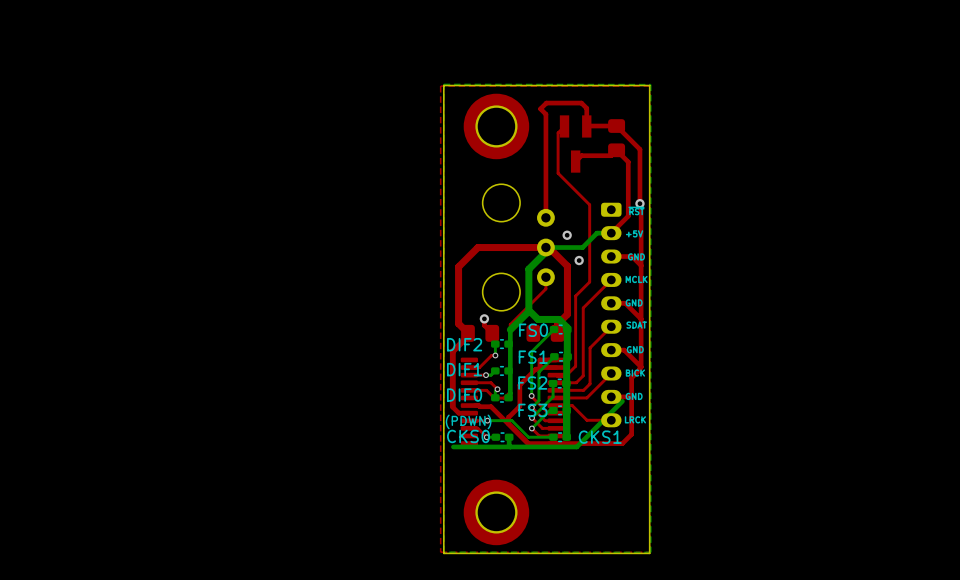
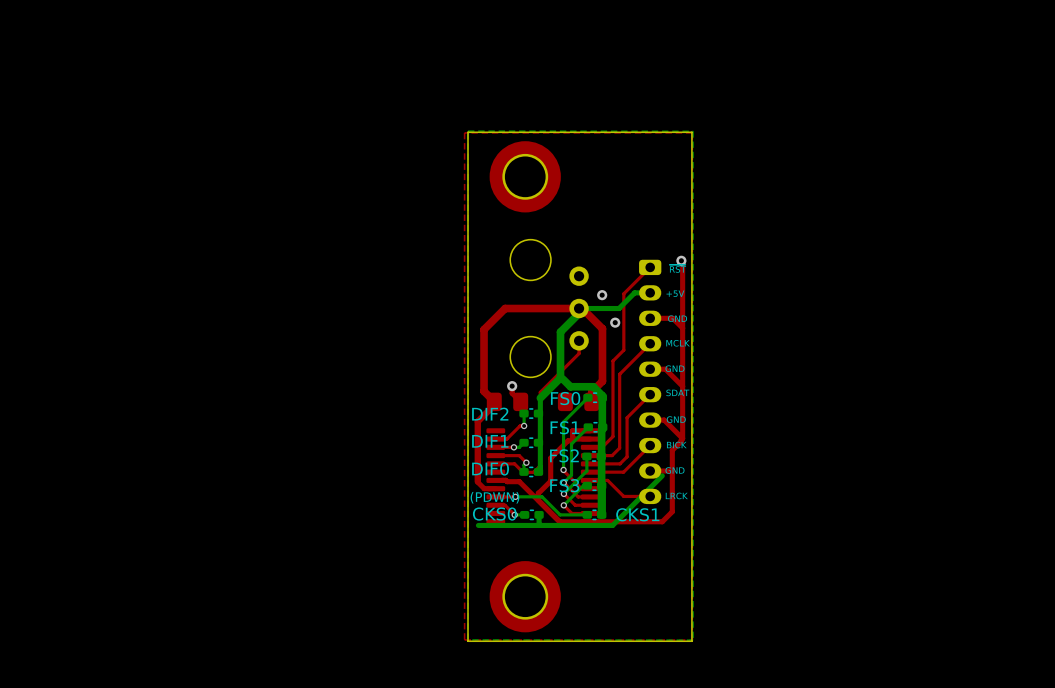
top track: (564, 126) (558, 132) (558, 173) (589, 204) (589, 282) (575, 296) (575, 366) (565, 376) (556, 375) -> (650, 267) (623, 293) (623, 350) (612, 361) (612, 436) (602, 447) (590, 447)
part: (616, 138) -> none
part: (575, 144) -> none
top track: (575, 161) (581, 155) (611, 155) (616, 150) (628, 161) (628, 216) (611, 233) -> none
top track: (639, 203) (639, 149) (616, 126) (586, 126) (586, 108) (581, 103) (546, 103) (540, 108) (545, 114) (545, 217) -> none

